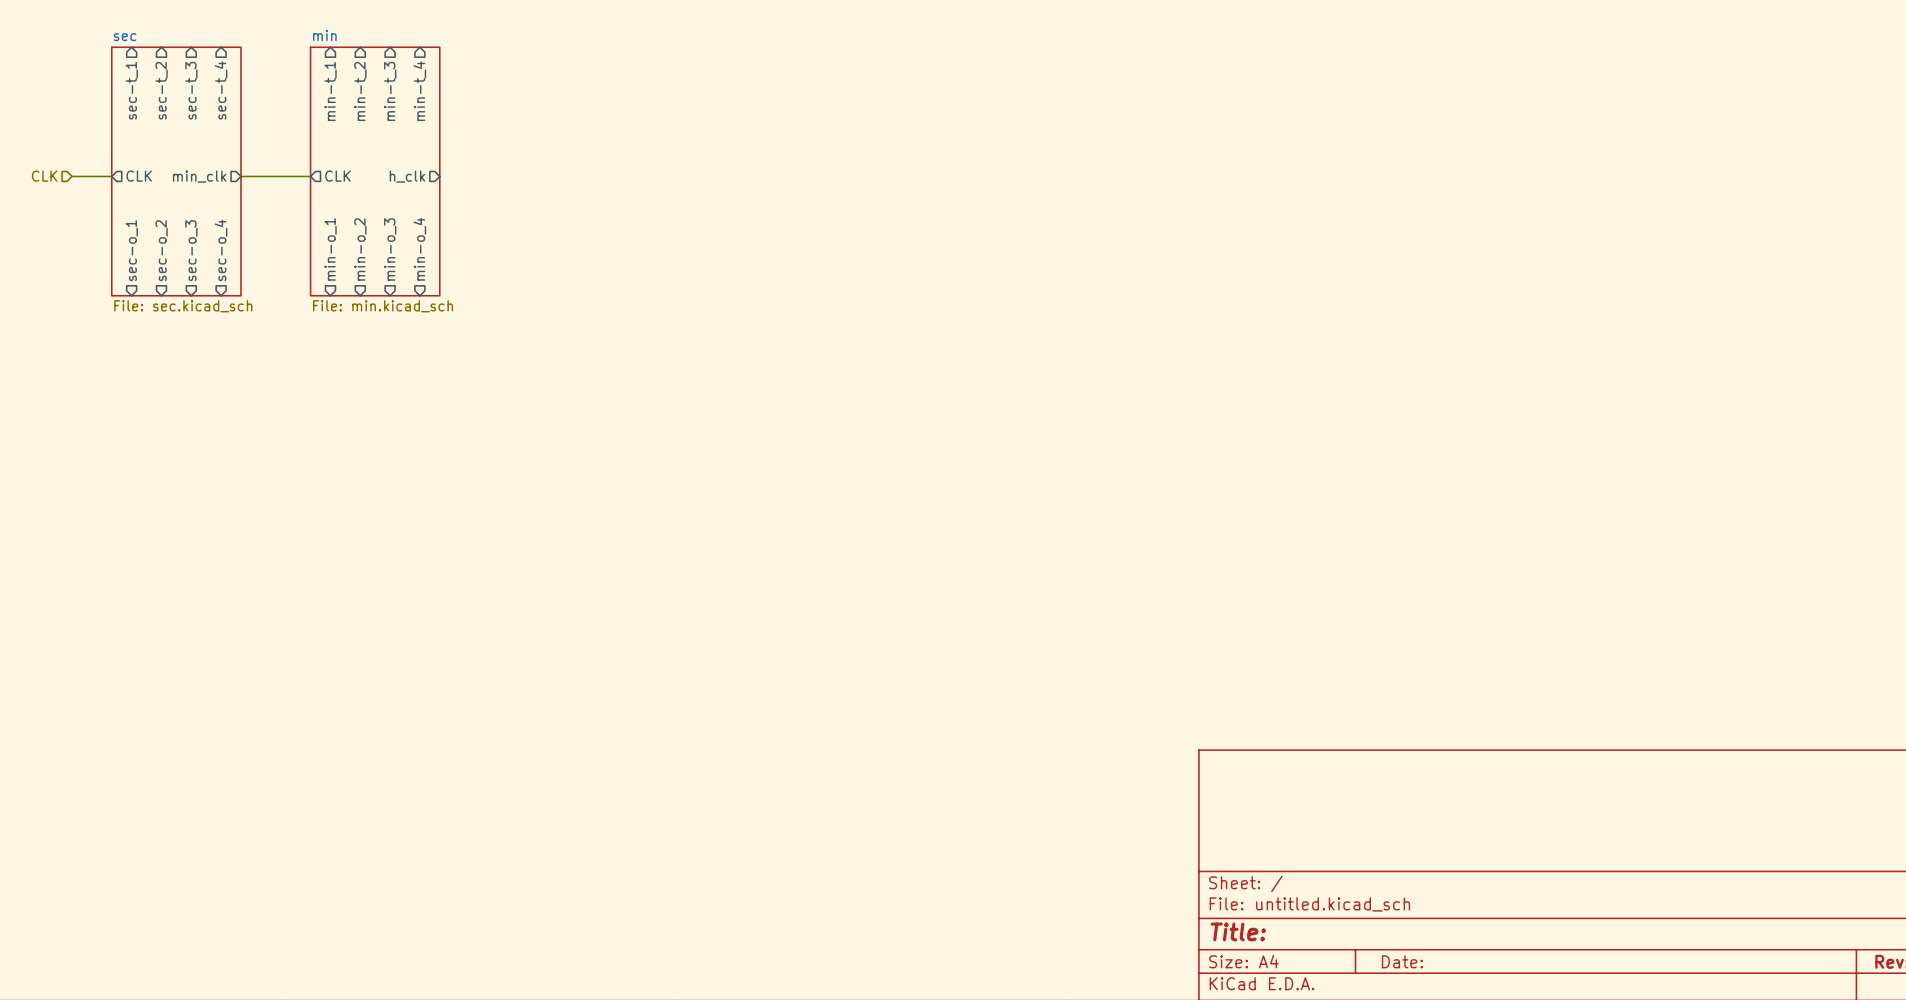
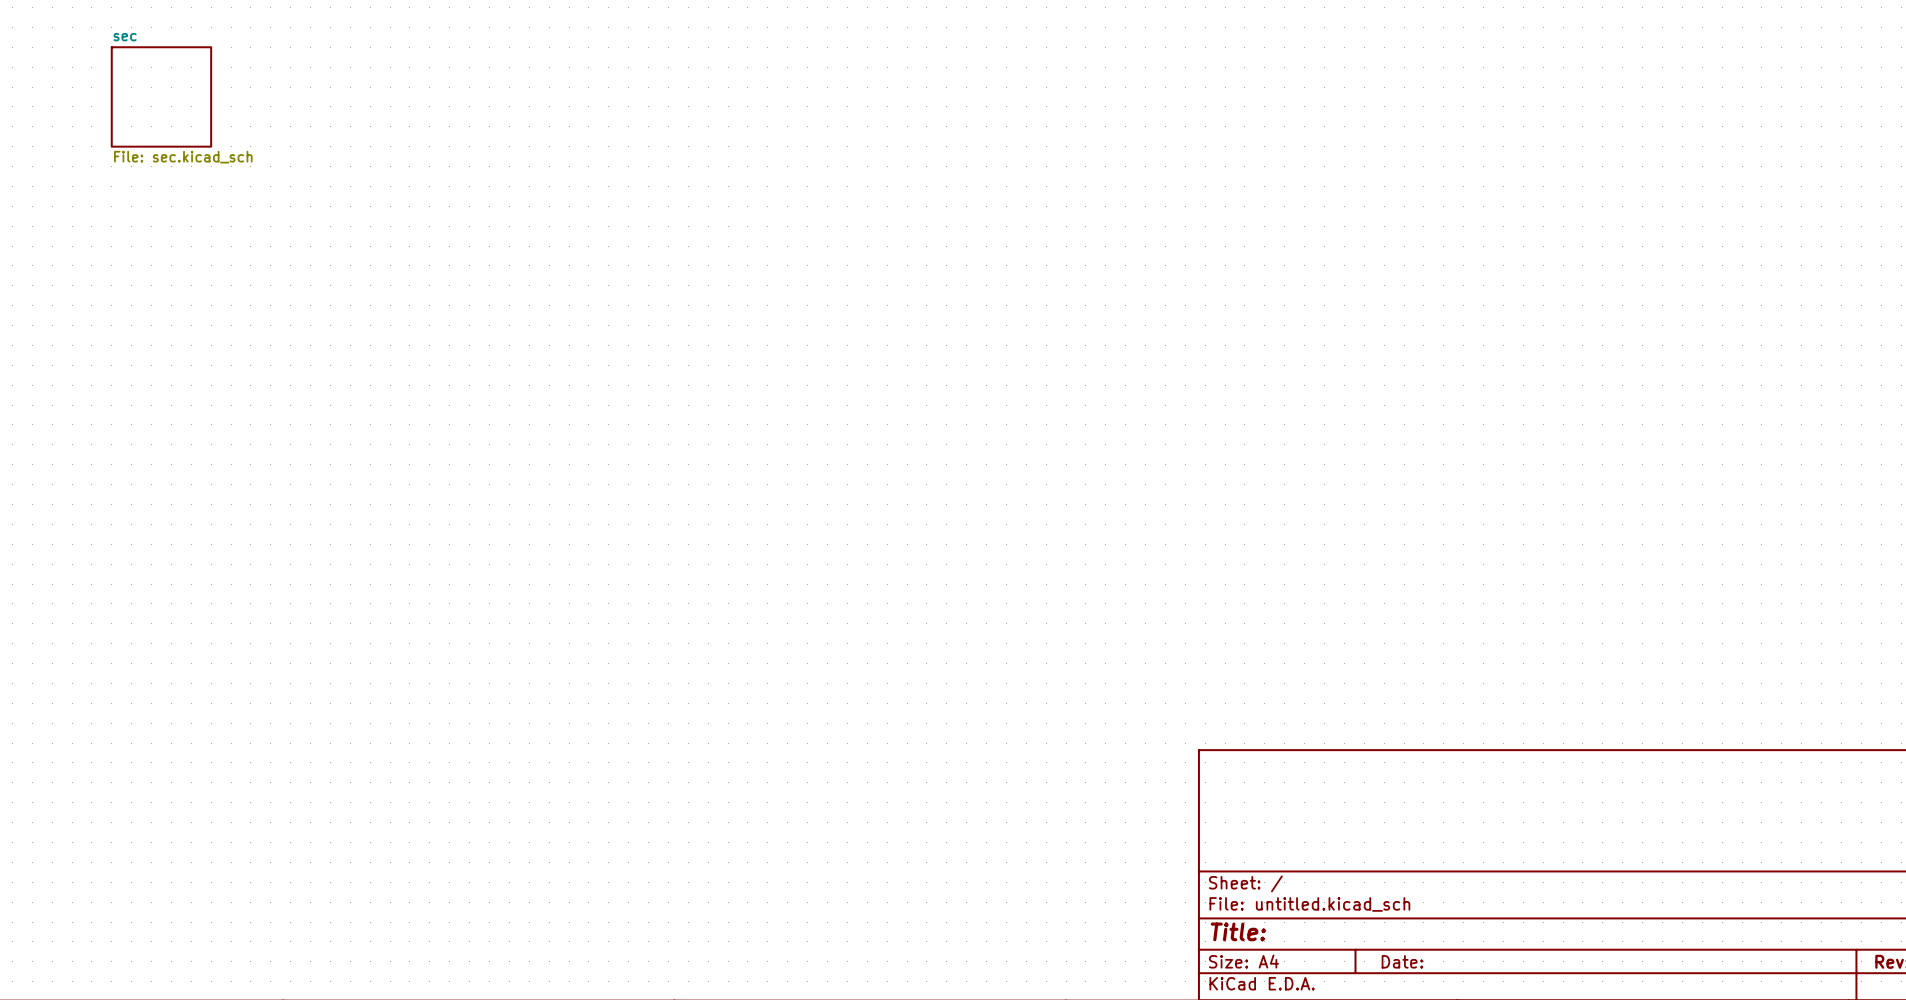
sheet pin: sec-t_1 (131, 90) -> none
sheet pin: sec-t_2 (161, 90) -> none
sheet pin: sec-t_3 (191, 90) -> none
sheet pin: sec-t_4 (220, 90) -> none
sheet pin: min-t_1 (330, 91) -> none
sheet pin: min-t_2 (360, 91) -> none
sheet pin: min-t_3 (390, 91) -> none
sheet pin: min-t_4 (419, 91) -> none
sheet sec: none -> File: sec.kicad_sch (161, 96)
sheet sec: File: sec.kicad_sch (176, 171) -> none
sheet min: File: min.kicad_sch (375, 171) -> none
hierarchical label: CLK (44, 176) -> none
wire: (72, 176) (111, 176) -> none
sheet pin: CLK (139, 176) -> none
sheet pin: min_clk (199, 176) -> none
wire: (240, 176) (310, 176) -> none
sheet pin: CLK (337, 176) -> none
sheet pin: h_clk (407, 176) -> none
sheet pin: min-o_1 (330, 249) -> none
sheet pin: min-o_2 (360, 249) -> none
sheet pin: min-o_3 (390, 249) -> none
sheet pin: min-o_4 (419, 249) -> none
sheet pin: sec-o_1 (131, 250) -> none
sheet pin: sec-o_2 (161, 250) -> none
sheet pin: sec-o_3 (191, 250) -> none
sheet pin: sec-o_4 (220, 250) -> none

